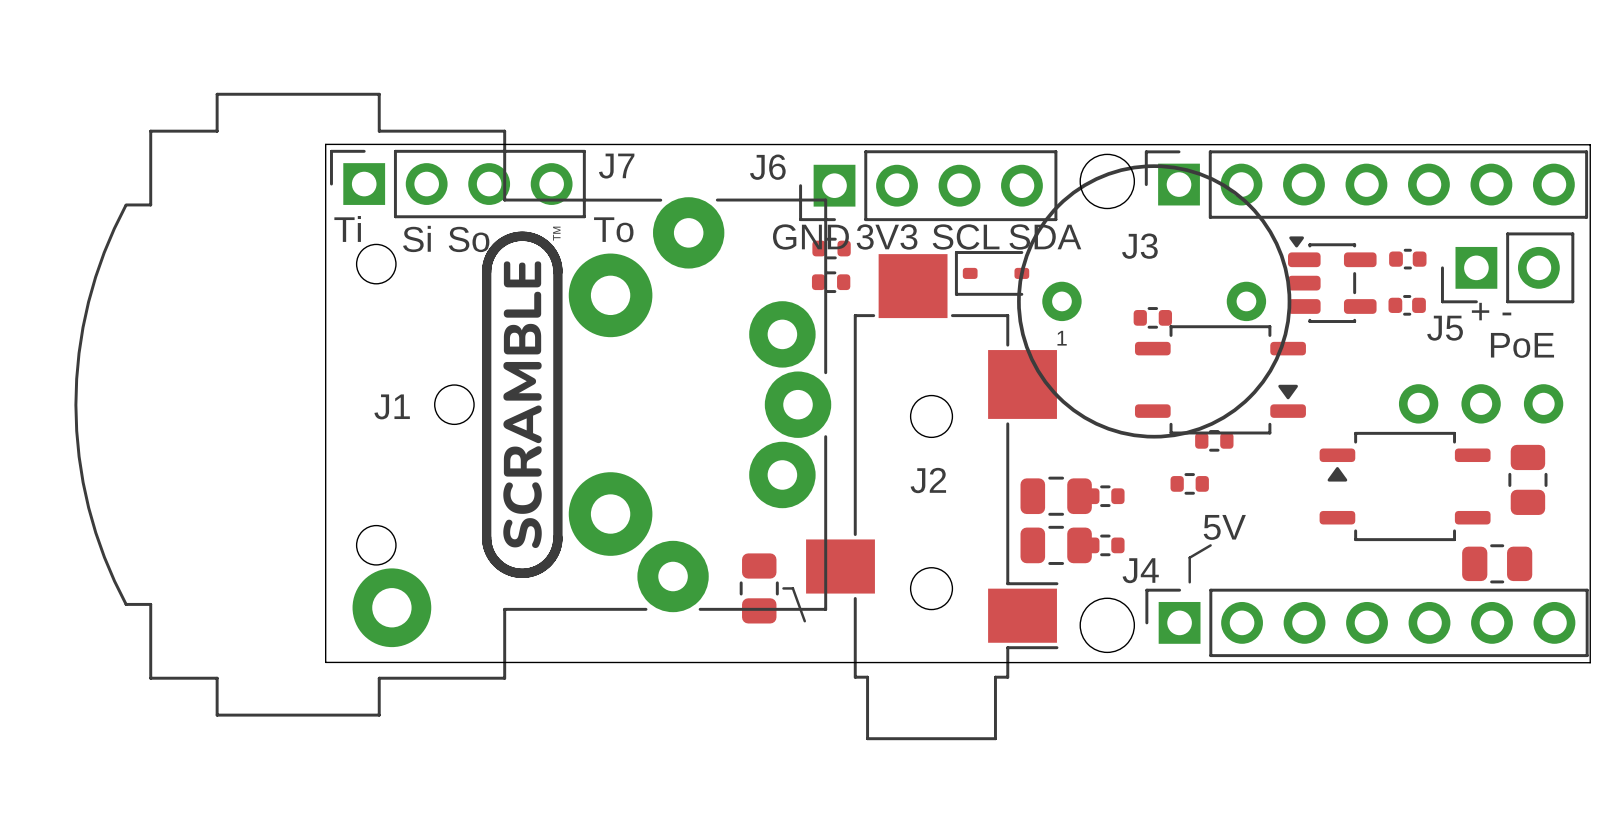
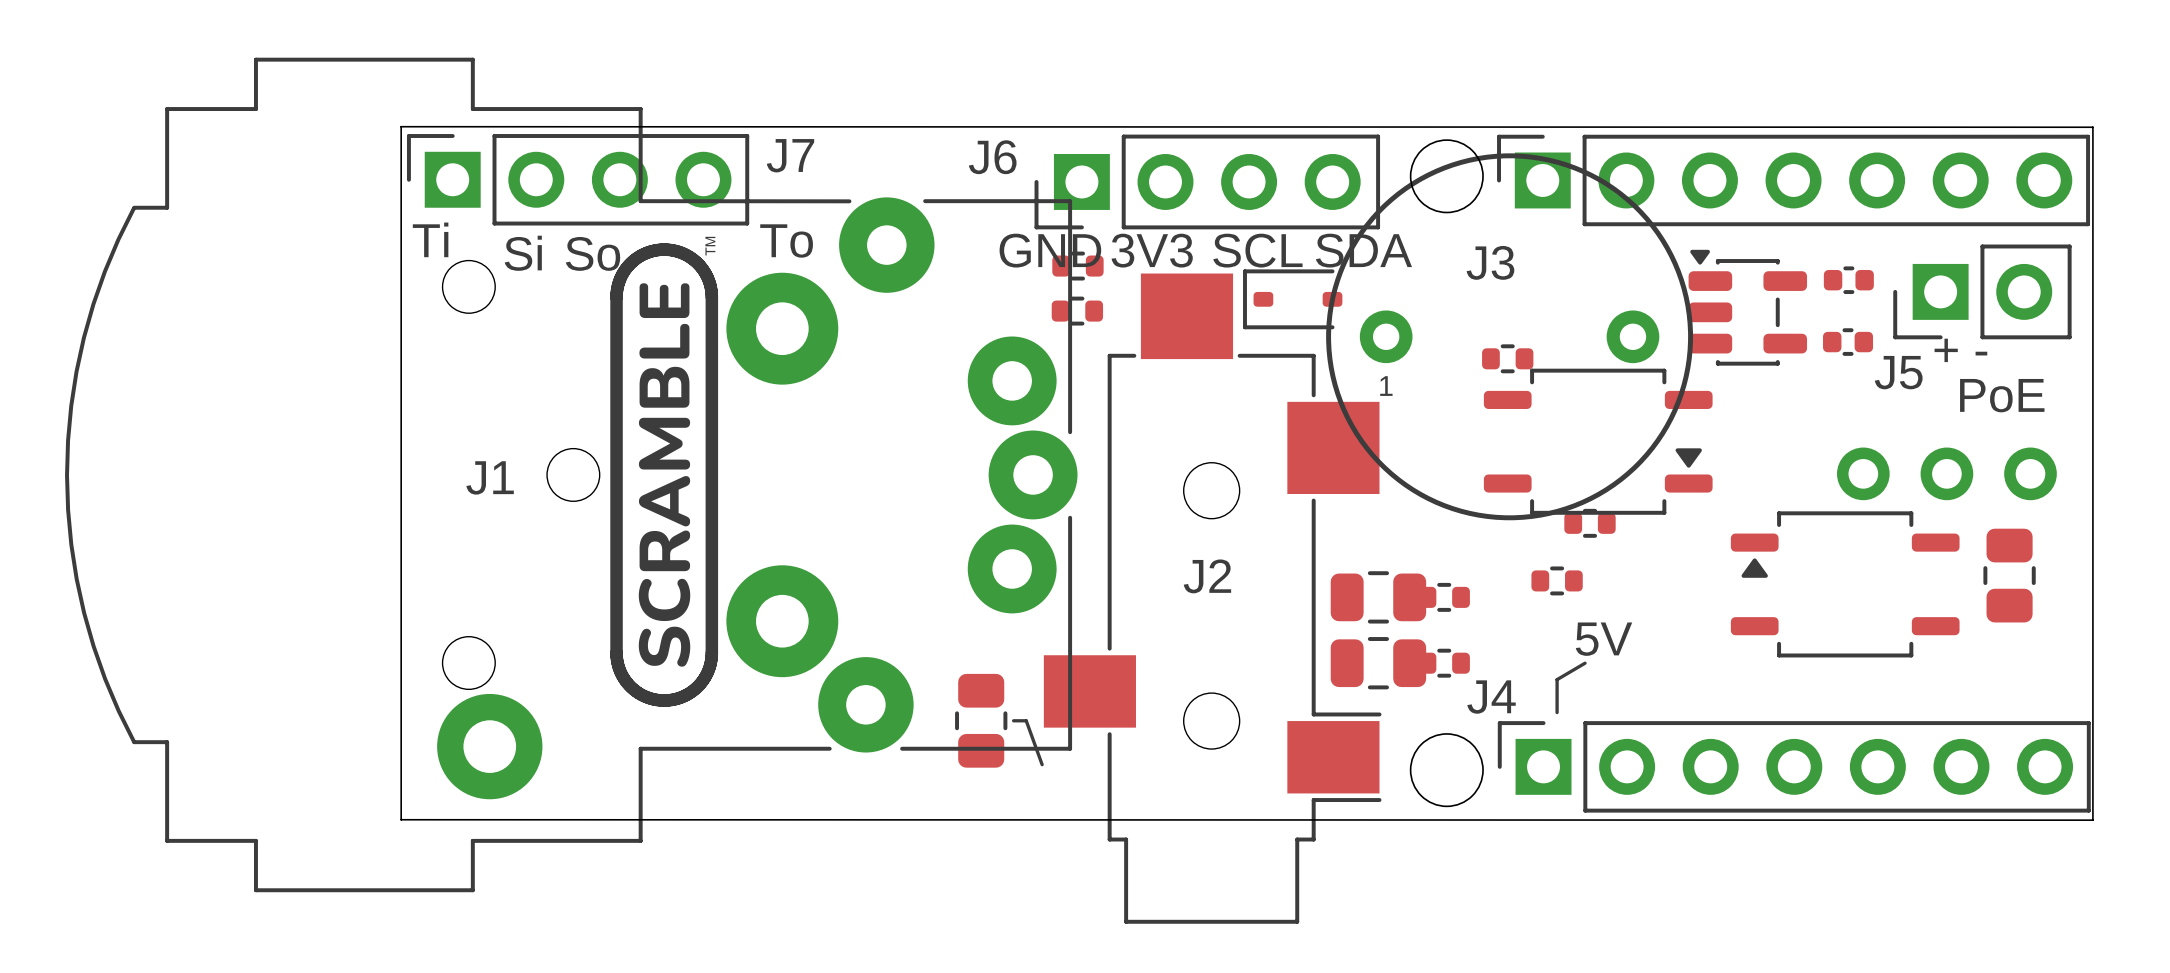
part: (1497, 563) -> none

